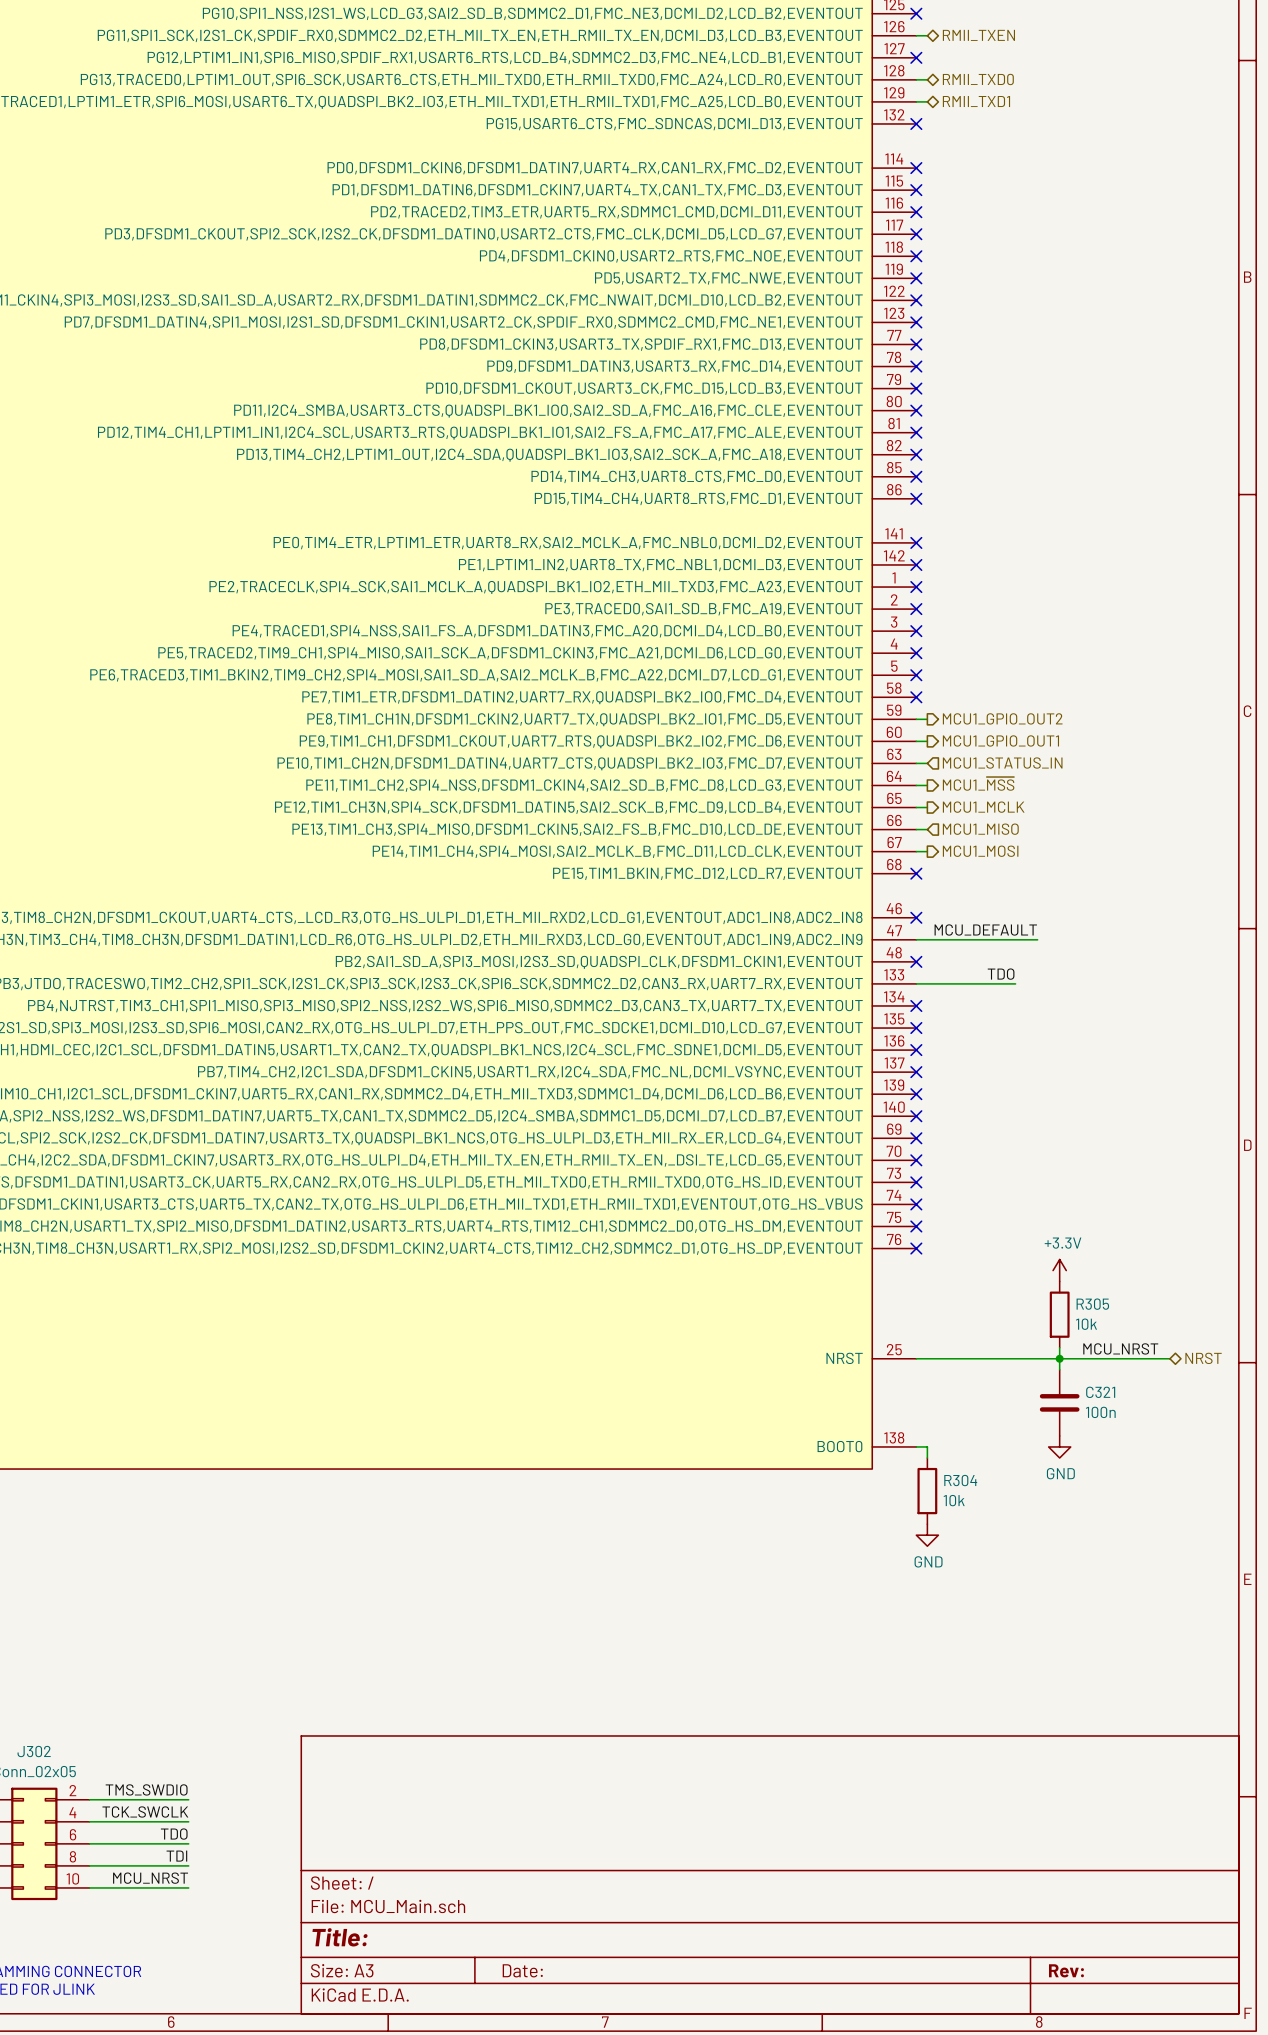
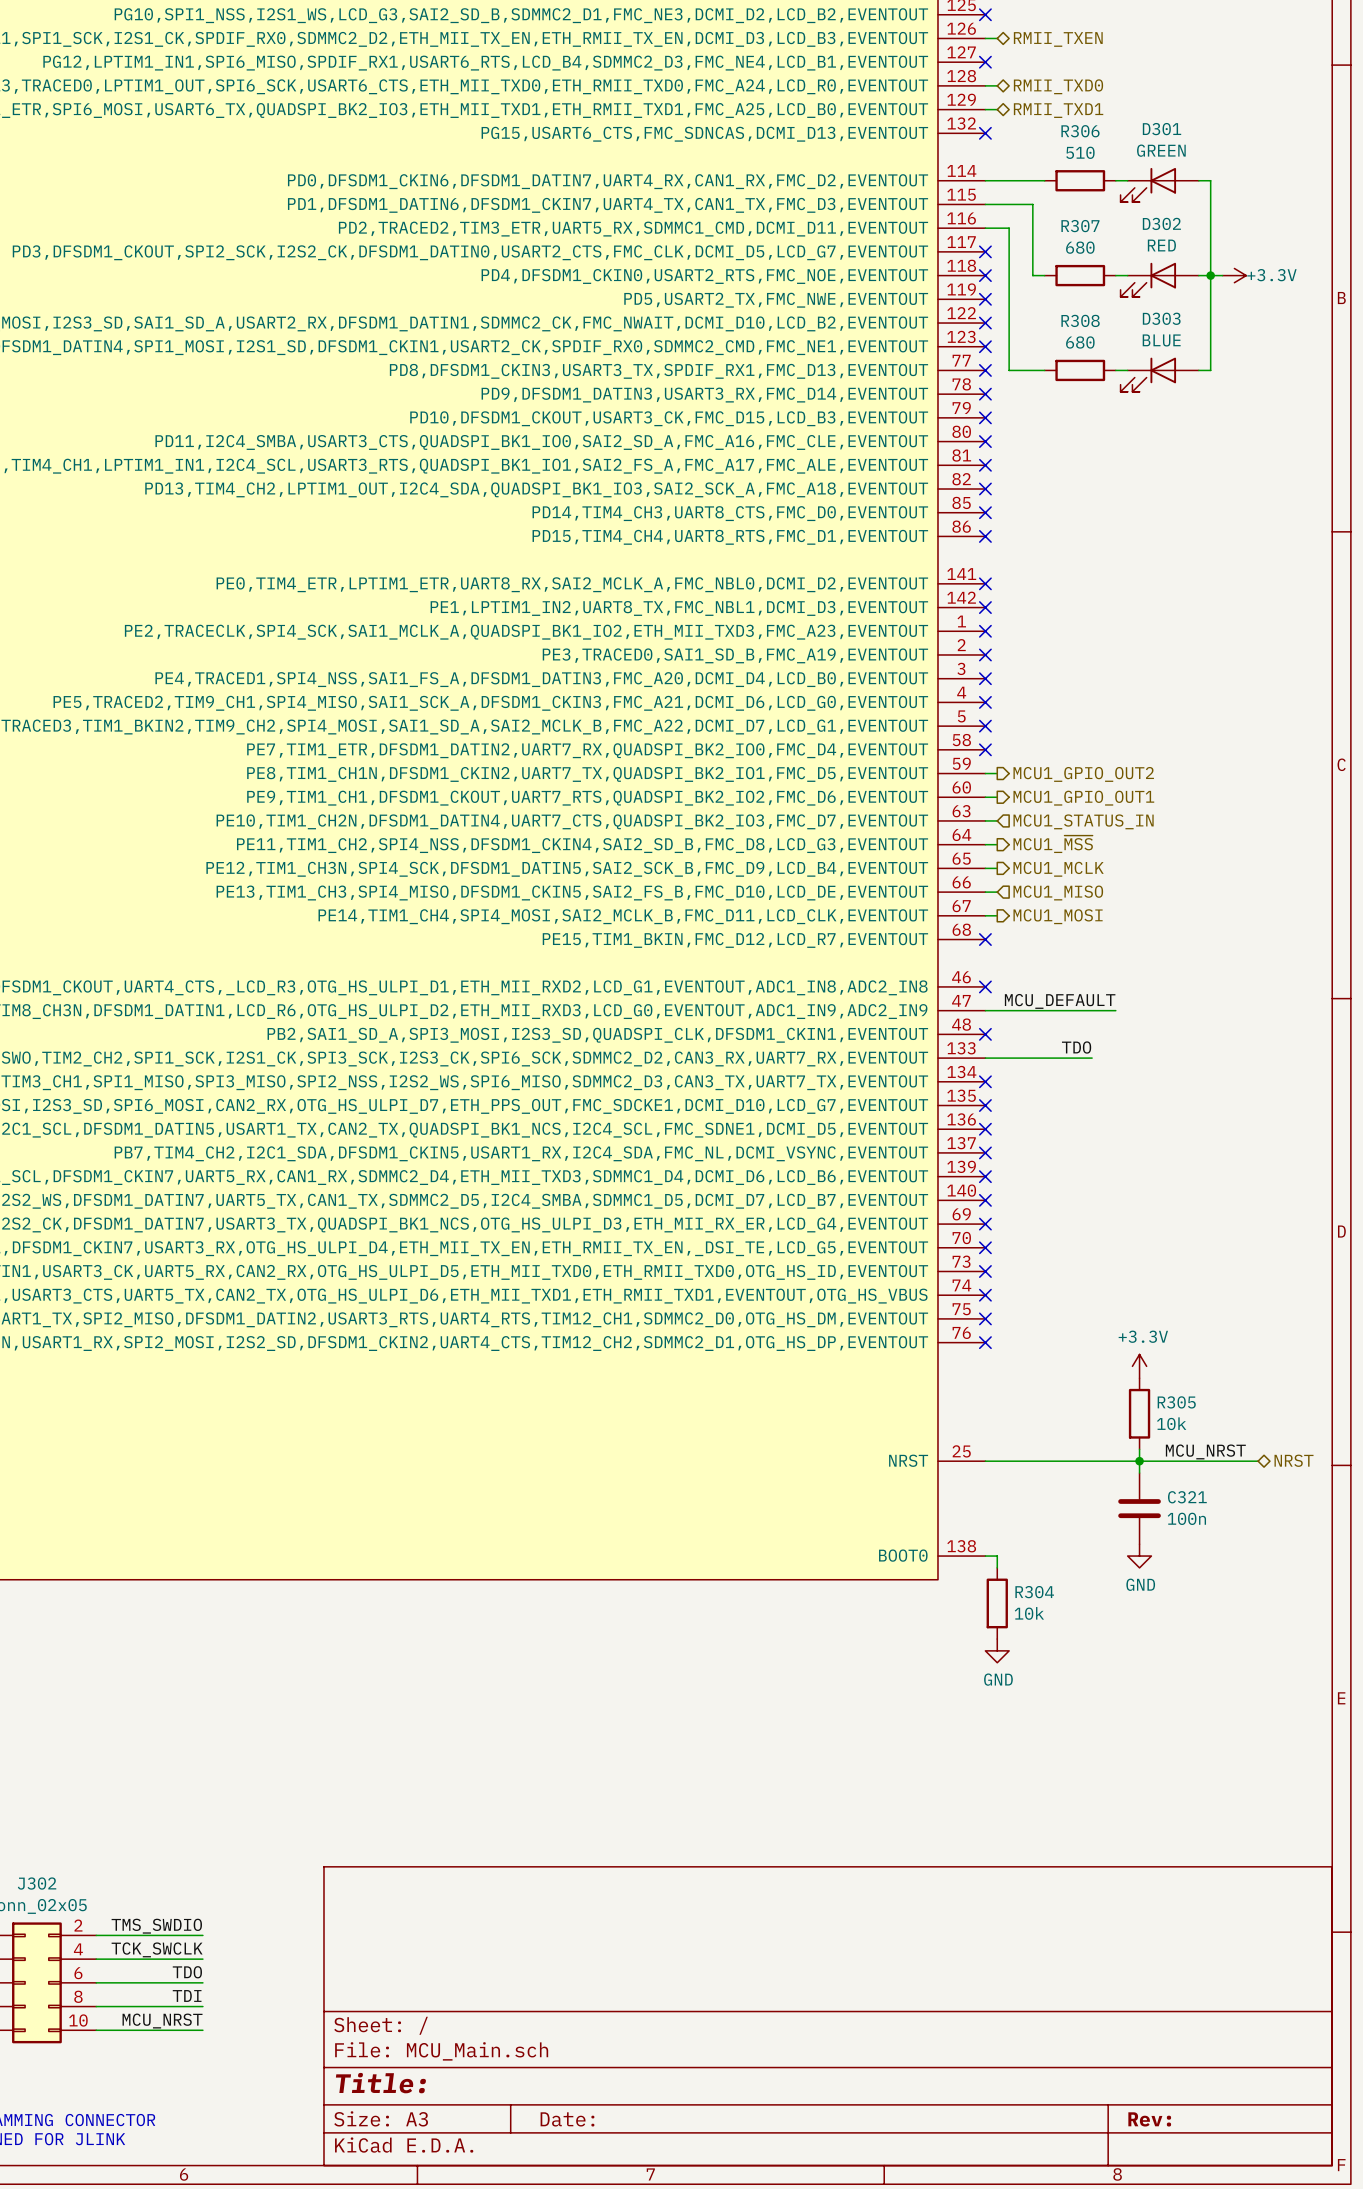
wire: none -> (985, 180) (1044, 180)
no-connect mark: (916, 168) -> none
R306: none -> 510 (1080, 180)
wire: none -> (1115, 180) (1127, 180)
wire: none -> (1198, 180) (1210, 180) (1210, 370) (1198, 370)
D301: none -> GREEN (1159, 185)
wire: none -> (985, 204) (1032, 204) (1032, 275) (1044, 275)
no-connect mark: (916, 190) -> none
wire: none -> (985, 228) (1009, 228) (1009, 370) (1044, 370)
no-connect mark: (916, 212) -> none
R307: none -> 680 (1080, 275)
wire: none -> (1115, 275) (1127, 275)
wire: none -> (1198, 275) (1222, 275)
junction: none -> (1210, 275)
power symbol: none -> +3.3V (1234, 275)
D302: none -> RED (1159, 279)
R308: none -> 680 (1080, 370)
wire: none -> (1115, 370) (1127, 370)
D303: none -> BLUE (1159, 374)

